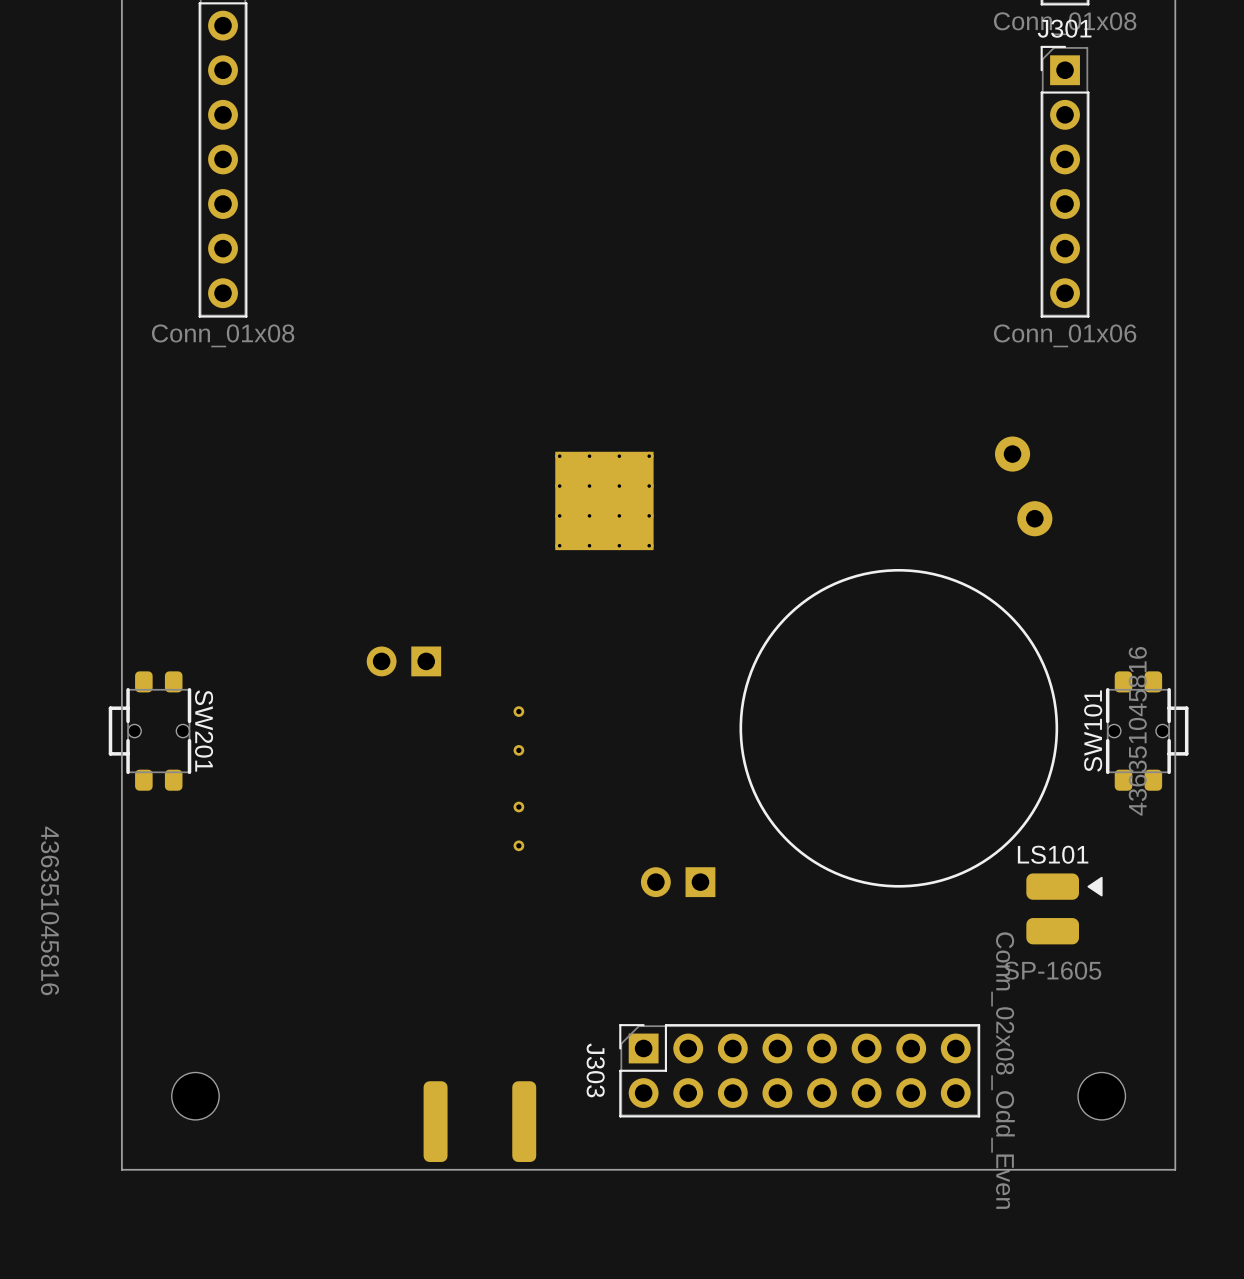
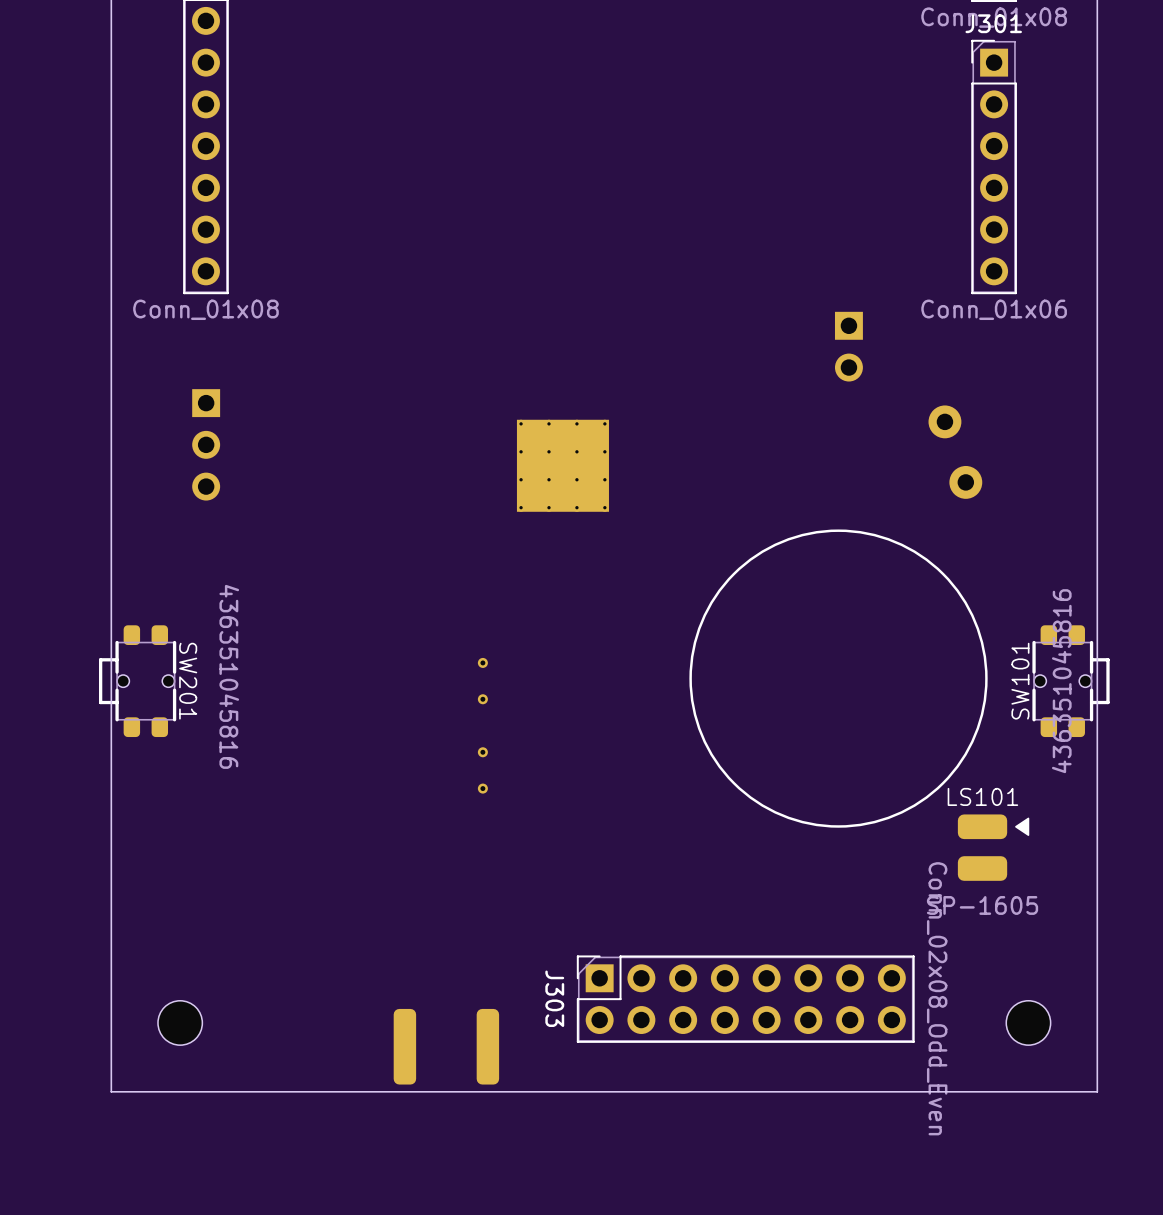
part: none -> (848, 346)
part: none -> (206, 444)
part: (403, 661) -> none
part: (678, 882) -> none
SW201 value position: 436351045816 (49, 910) -> 436351045816 (229, 676)

